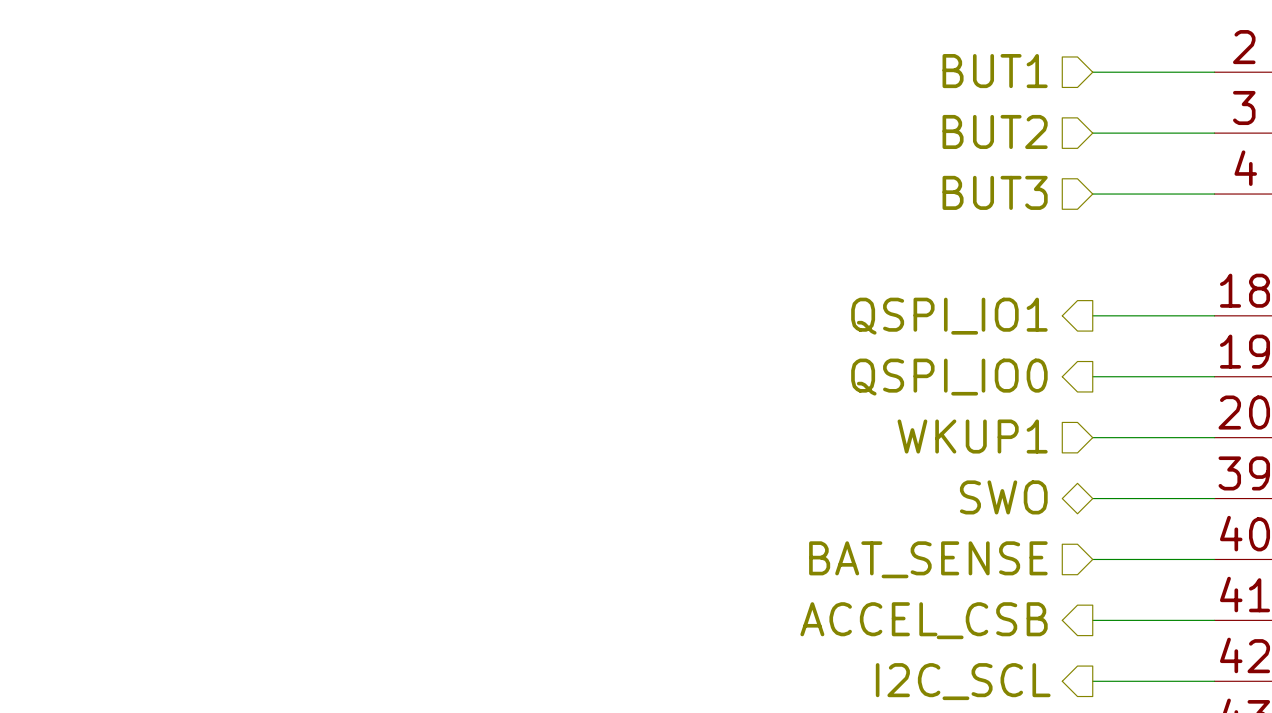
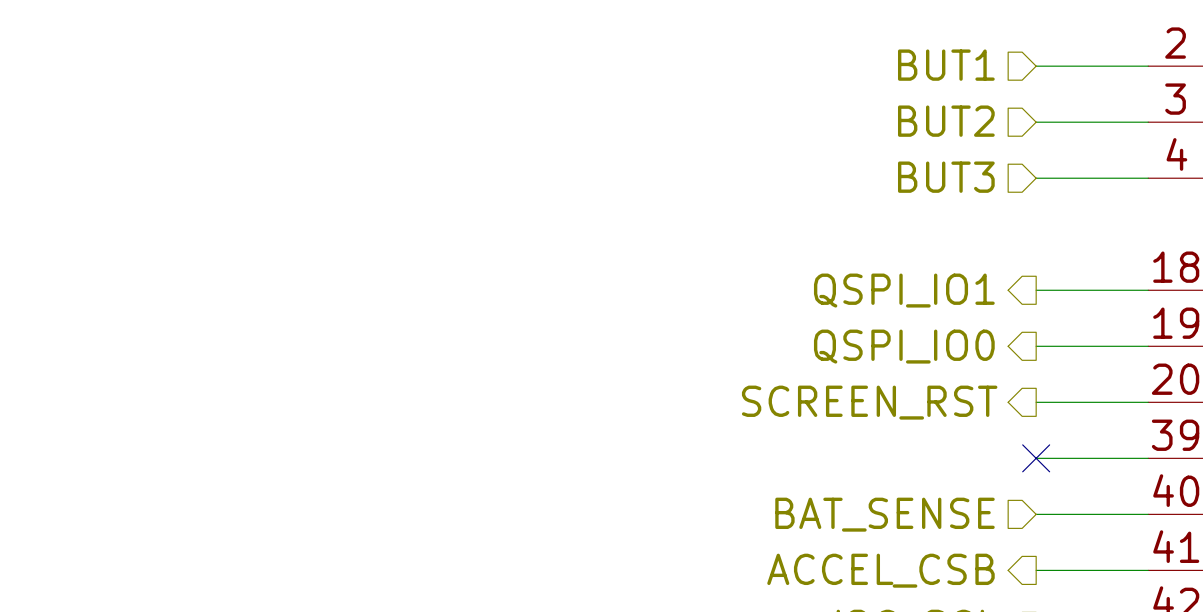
hierarchical label shape: input (972, 436) -> output (869, 402)
hierarchical label: WKUP1 (972, 436) -> SCREEN_RST (869, 402)
hierarchical label: SWO (1003, 497) -> none
no-connect mark: none -> (1036, 458)

